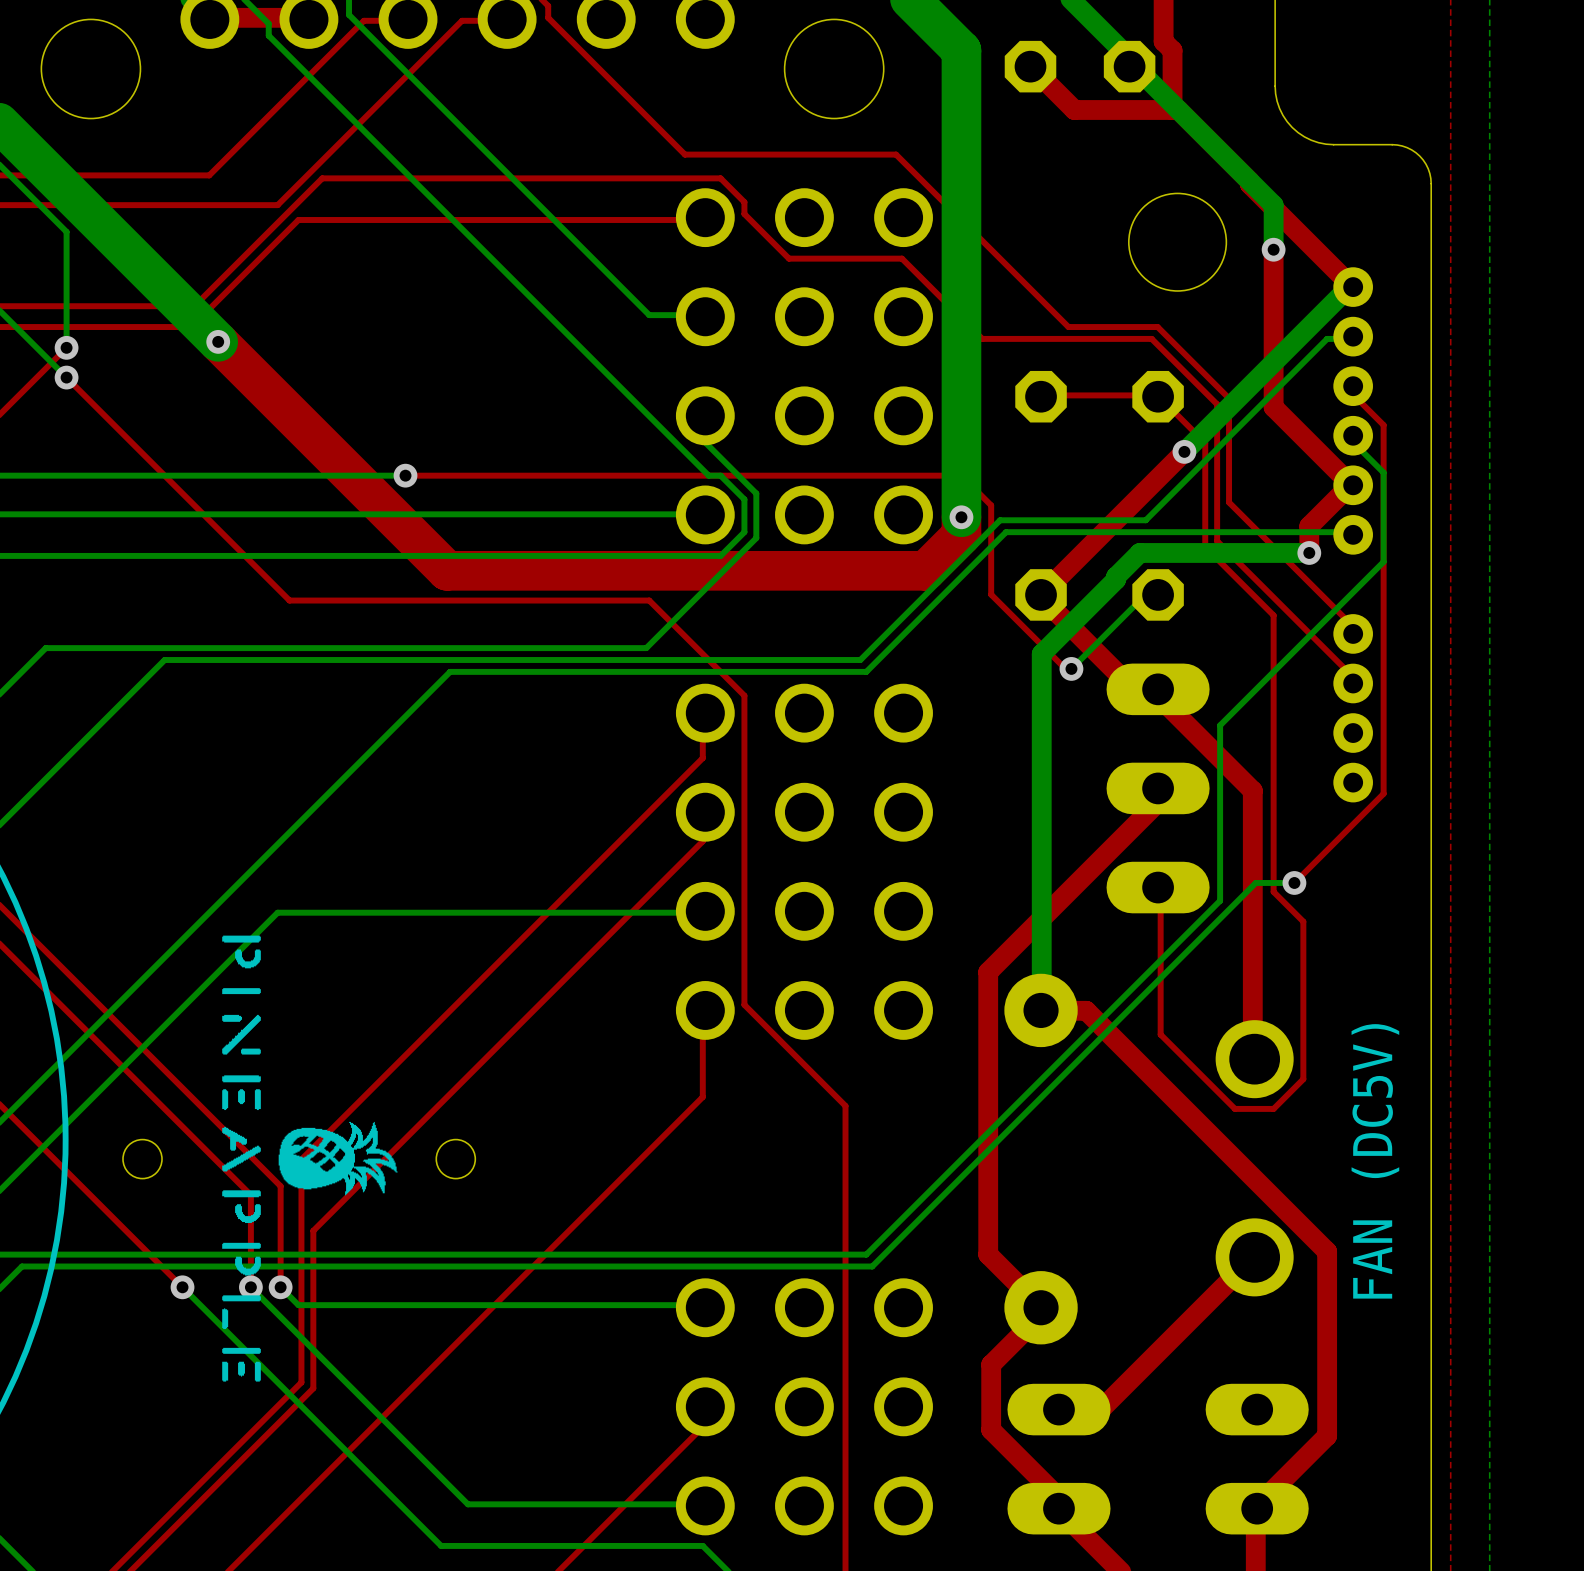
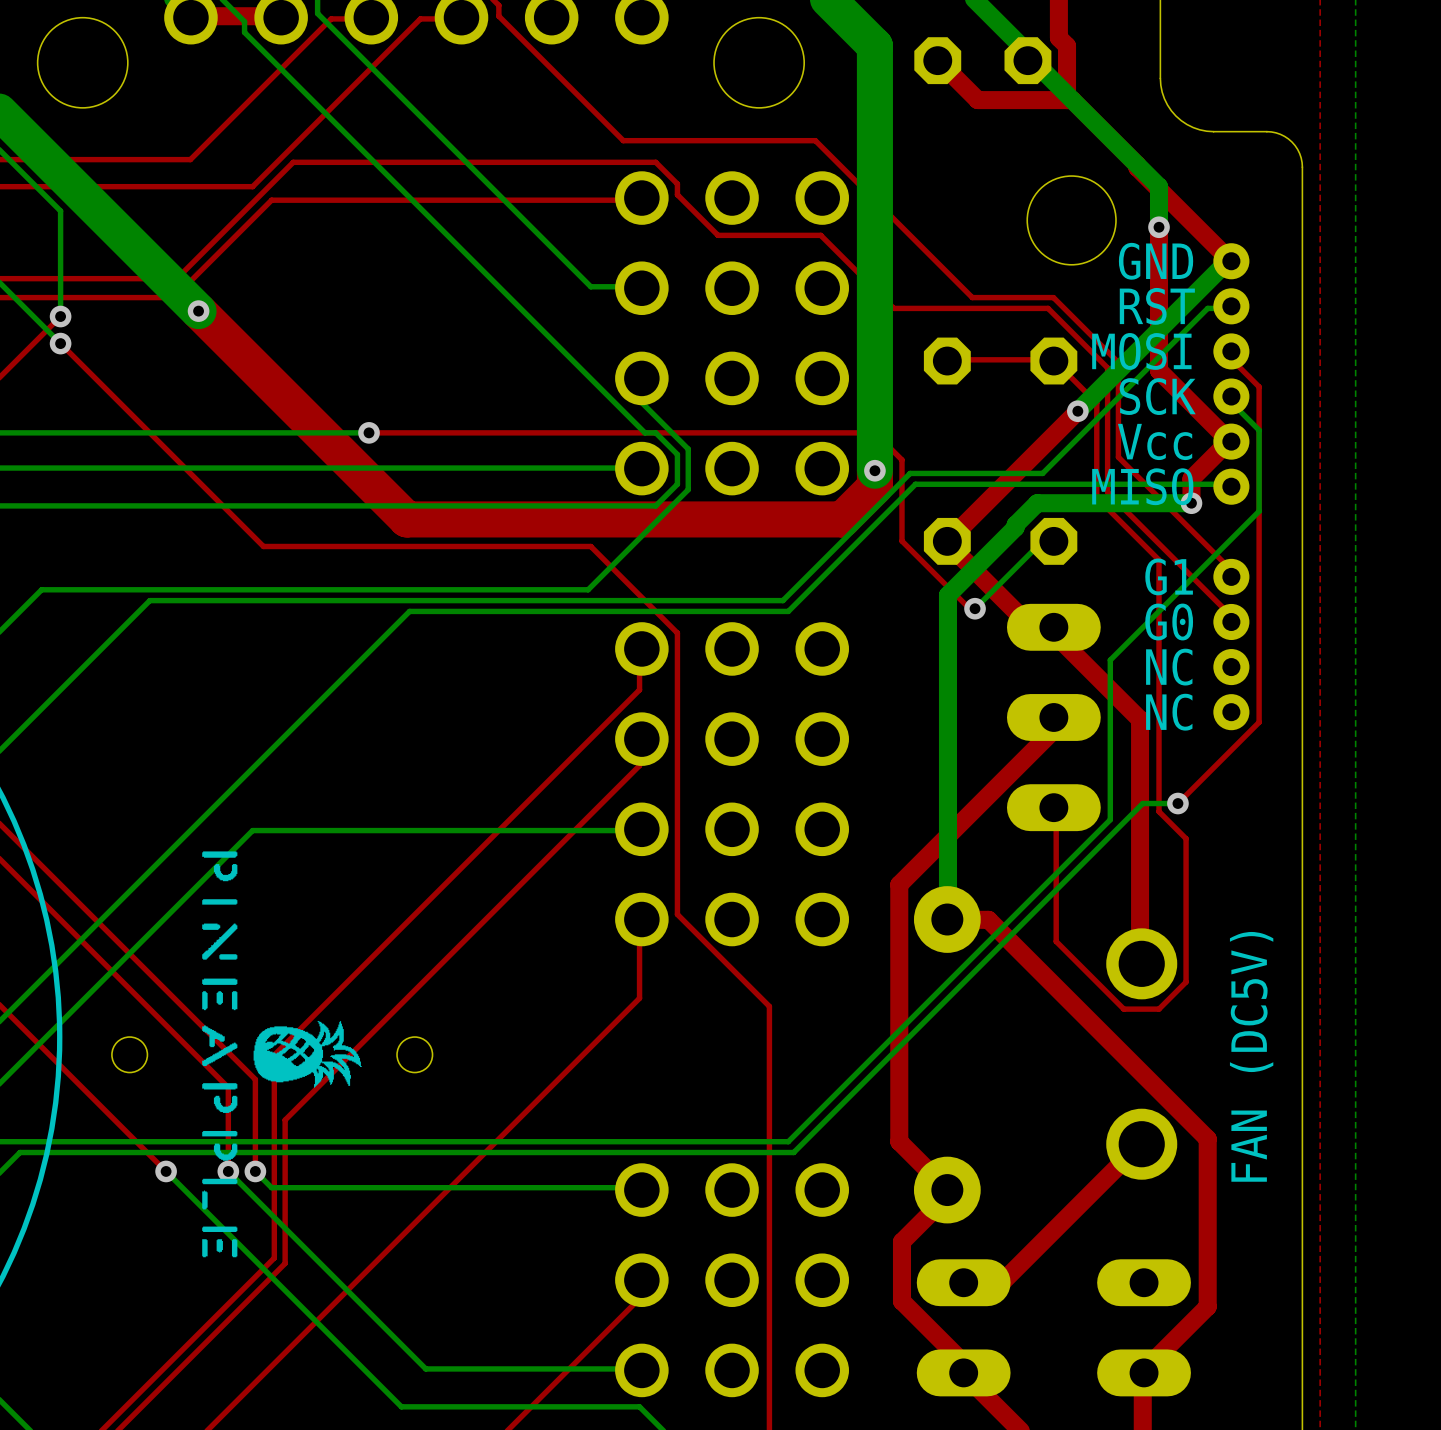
text: none -> GND (1156, 261)
text: none -> RST (1157, 306)
text: none -> MOSI (1141, 351)
text: none -> SCK (1157, 396)
text: none -> Vcc (1155, 441)
text: none -> MISO (1142, 486)
text: none -> G1 (1169, 576)
text: none -> G0 (1169, 622)
text: none -> NC (1169, 667)
text: none -> NC (1169, 712)

